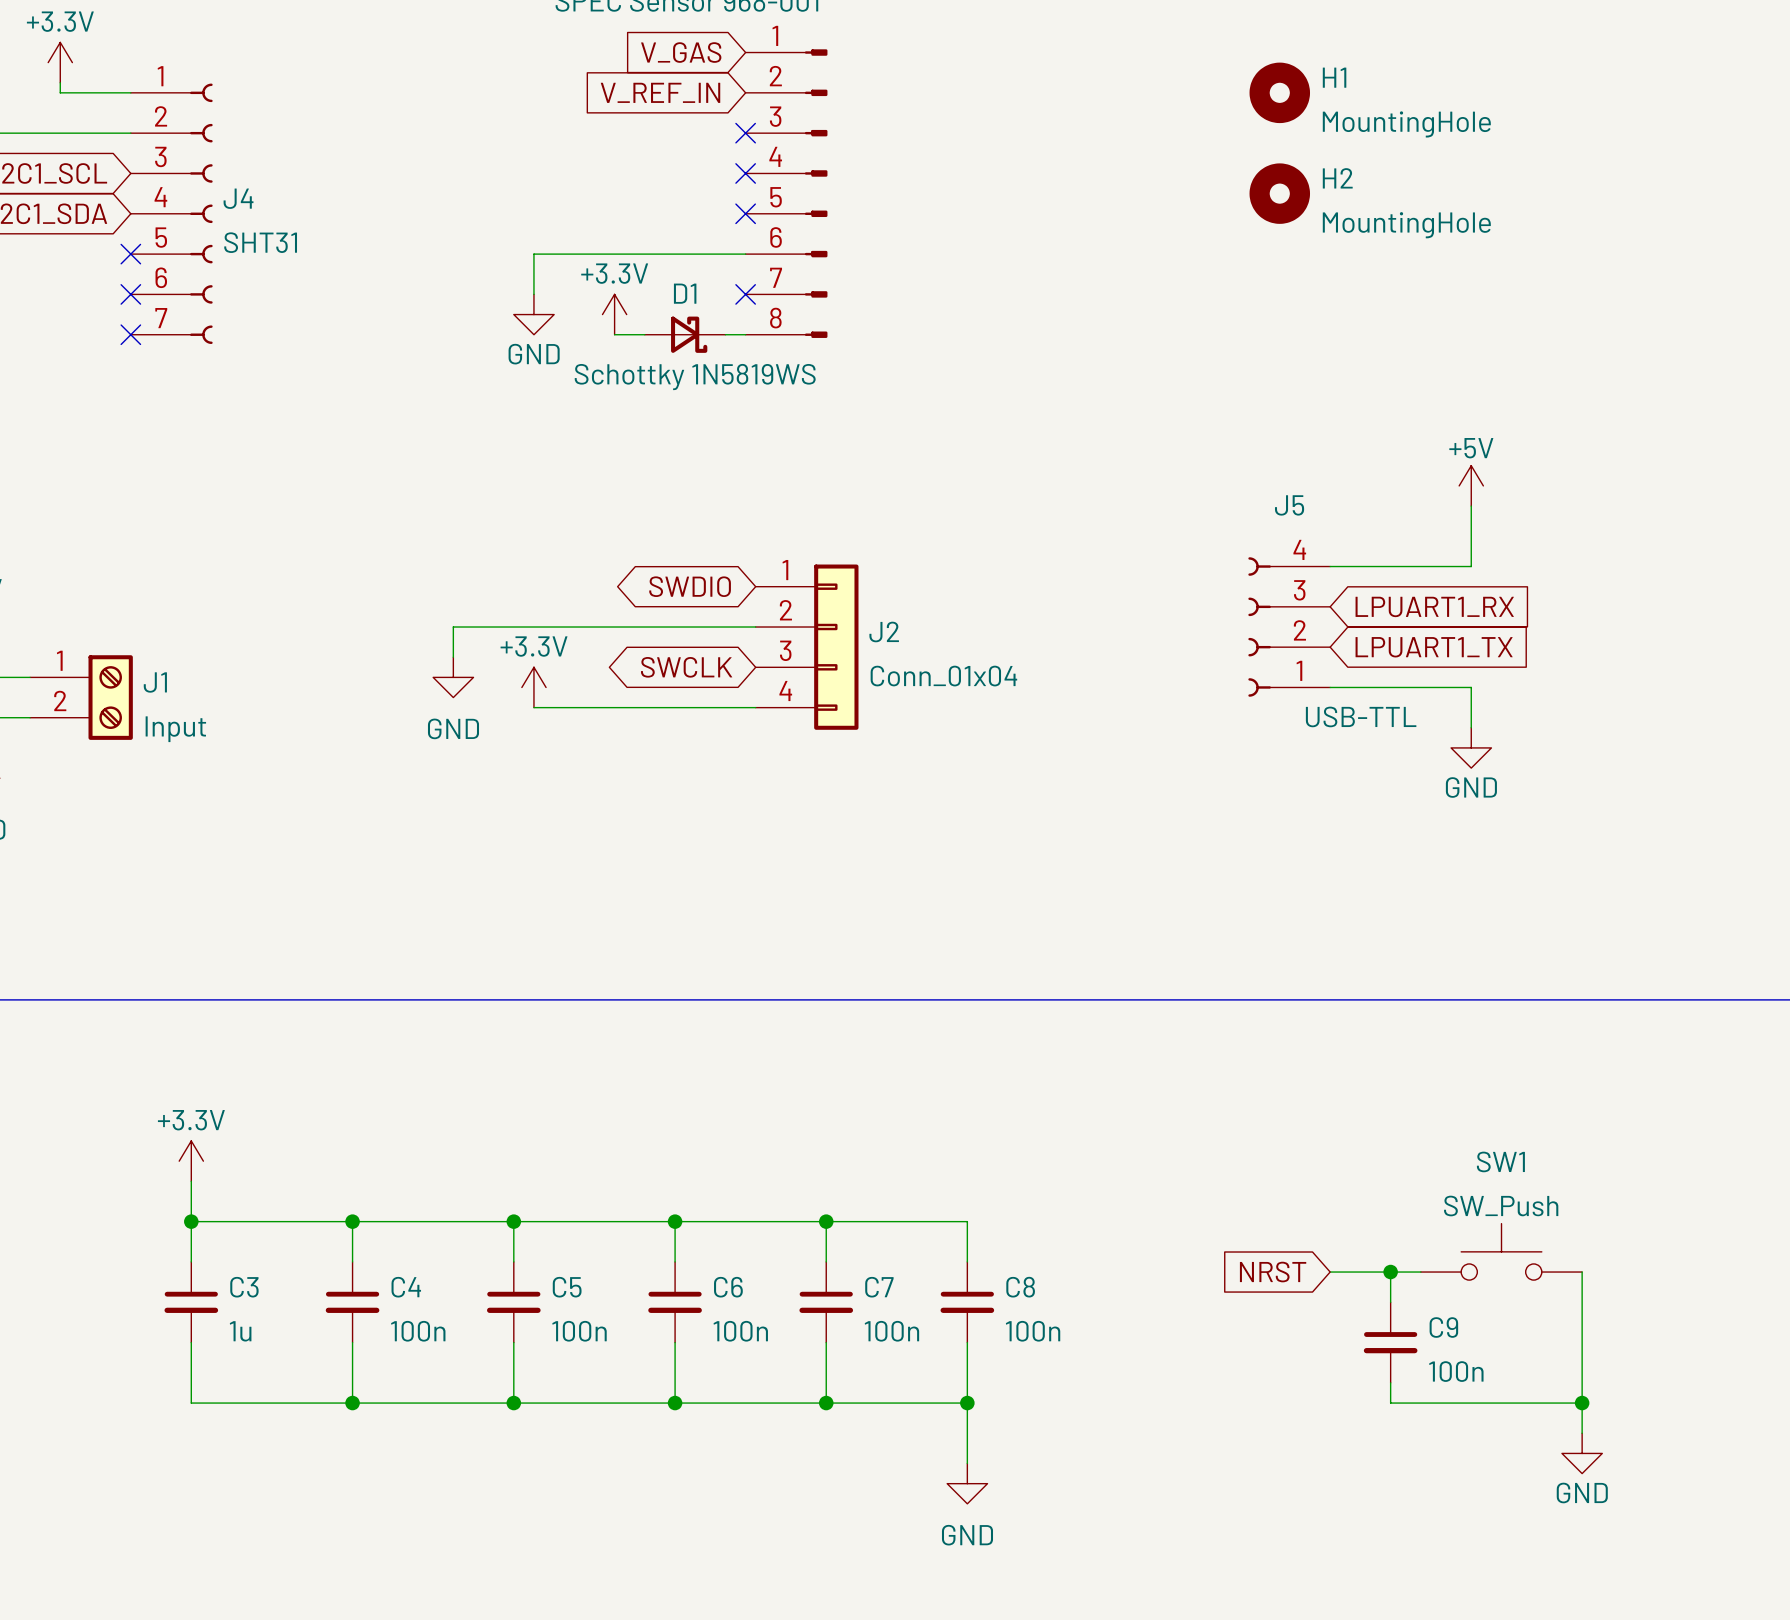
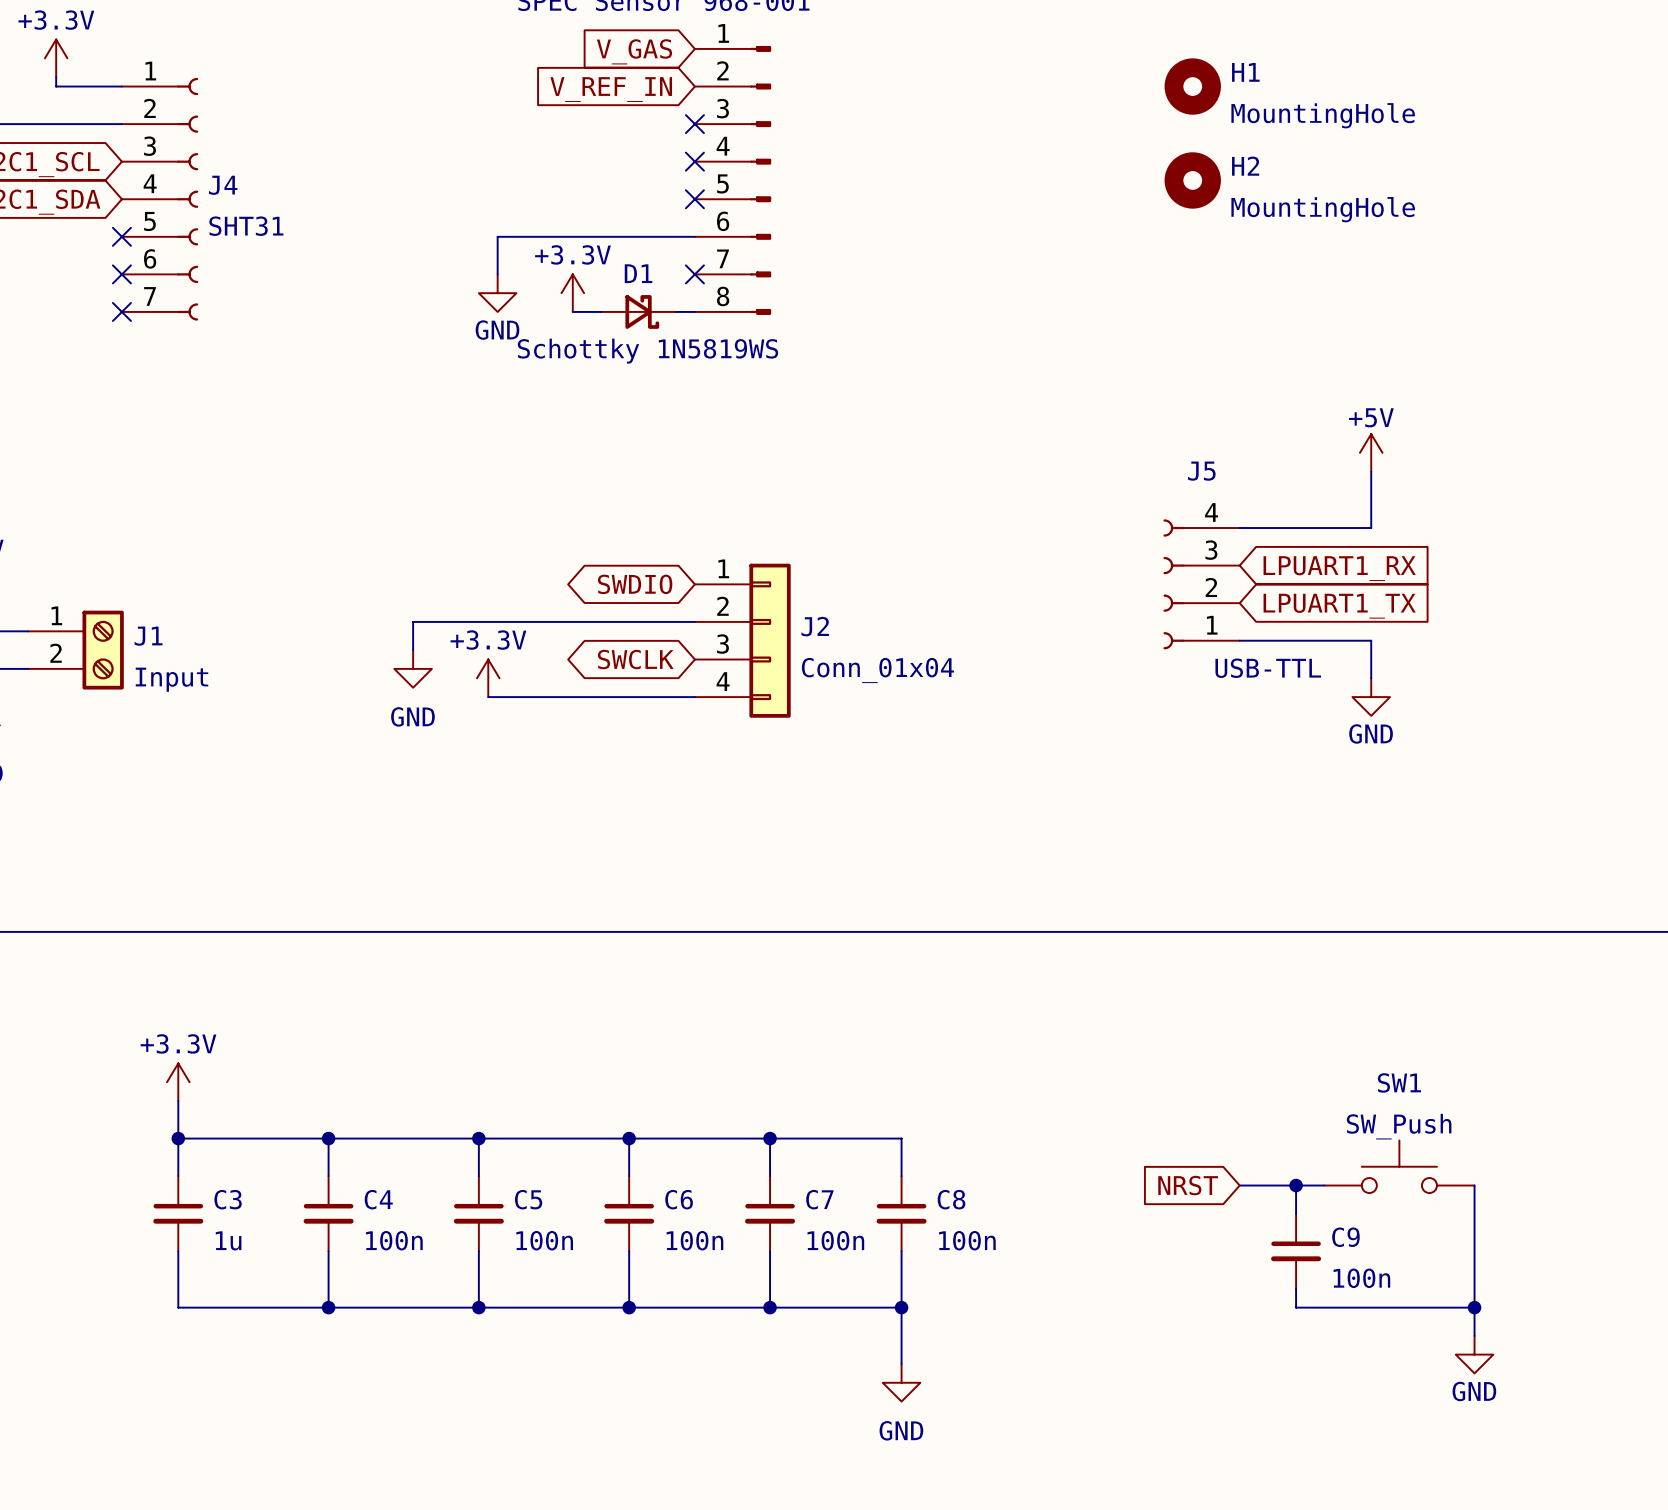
global label position: SWDIO (690, 586) -> SWDIO (635, 584)
wire: (755, 627) (453, 627) (453, 657) -> (694, 621) (413, 621) (413, 650)
J2 position: (807, 647) -> (742, 640)
global label position: SWCLK (686, 667) -> SWCLK (635, 659)
power symbol position: GND (453, 677) -> GND (413, 668)
power symbol position: +3.3V (533, 687) -> +3.3V (488, 678)
wire: (533, 707) (755, 707) -> (488, 697) (694, 697)

